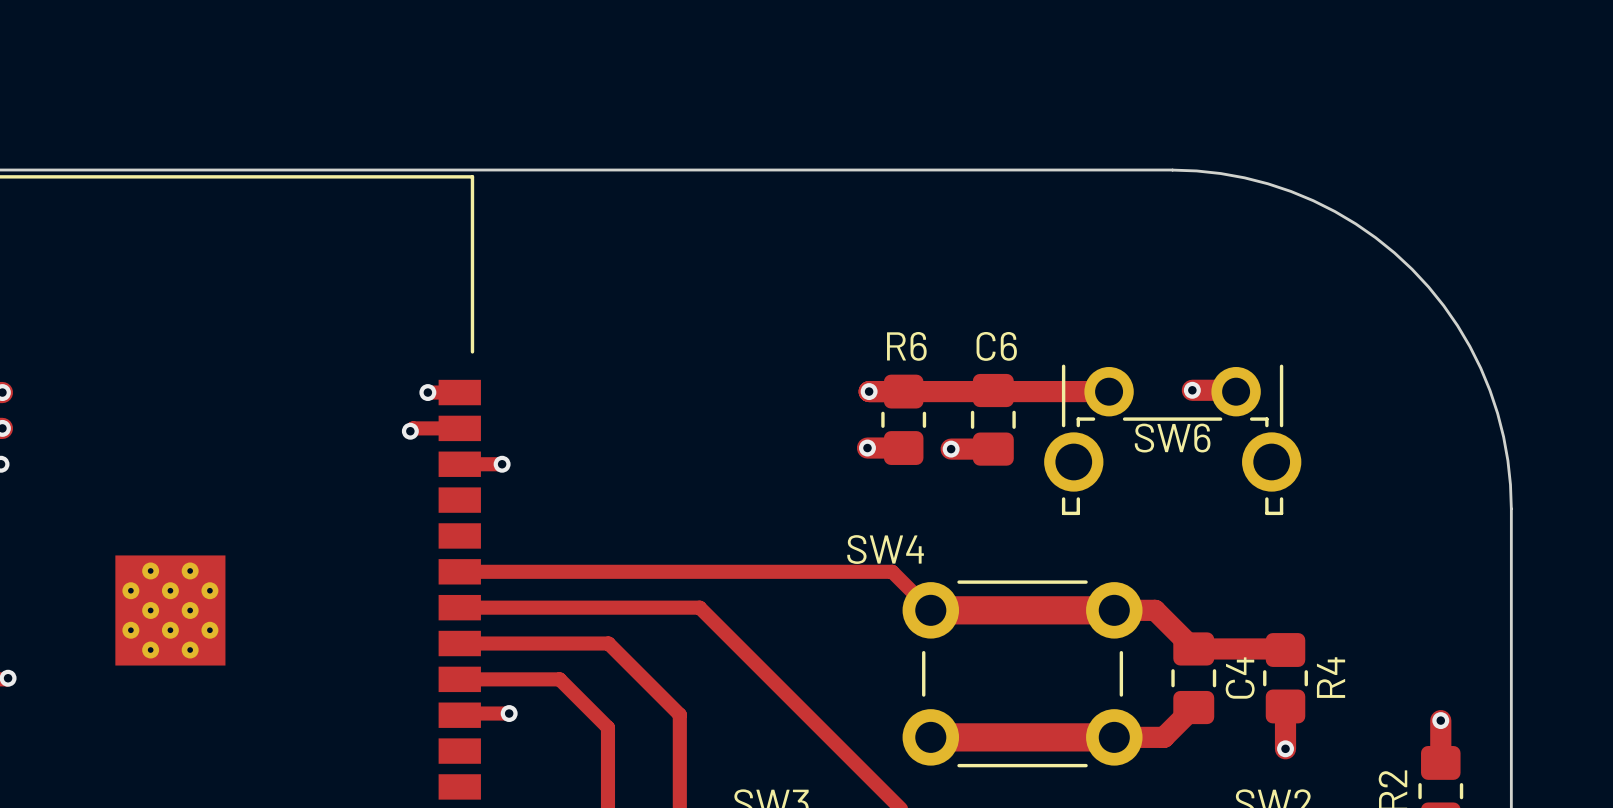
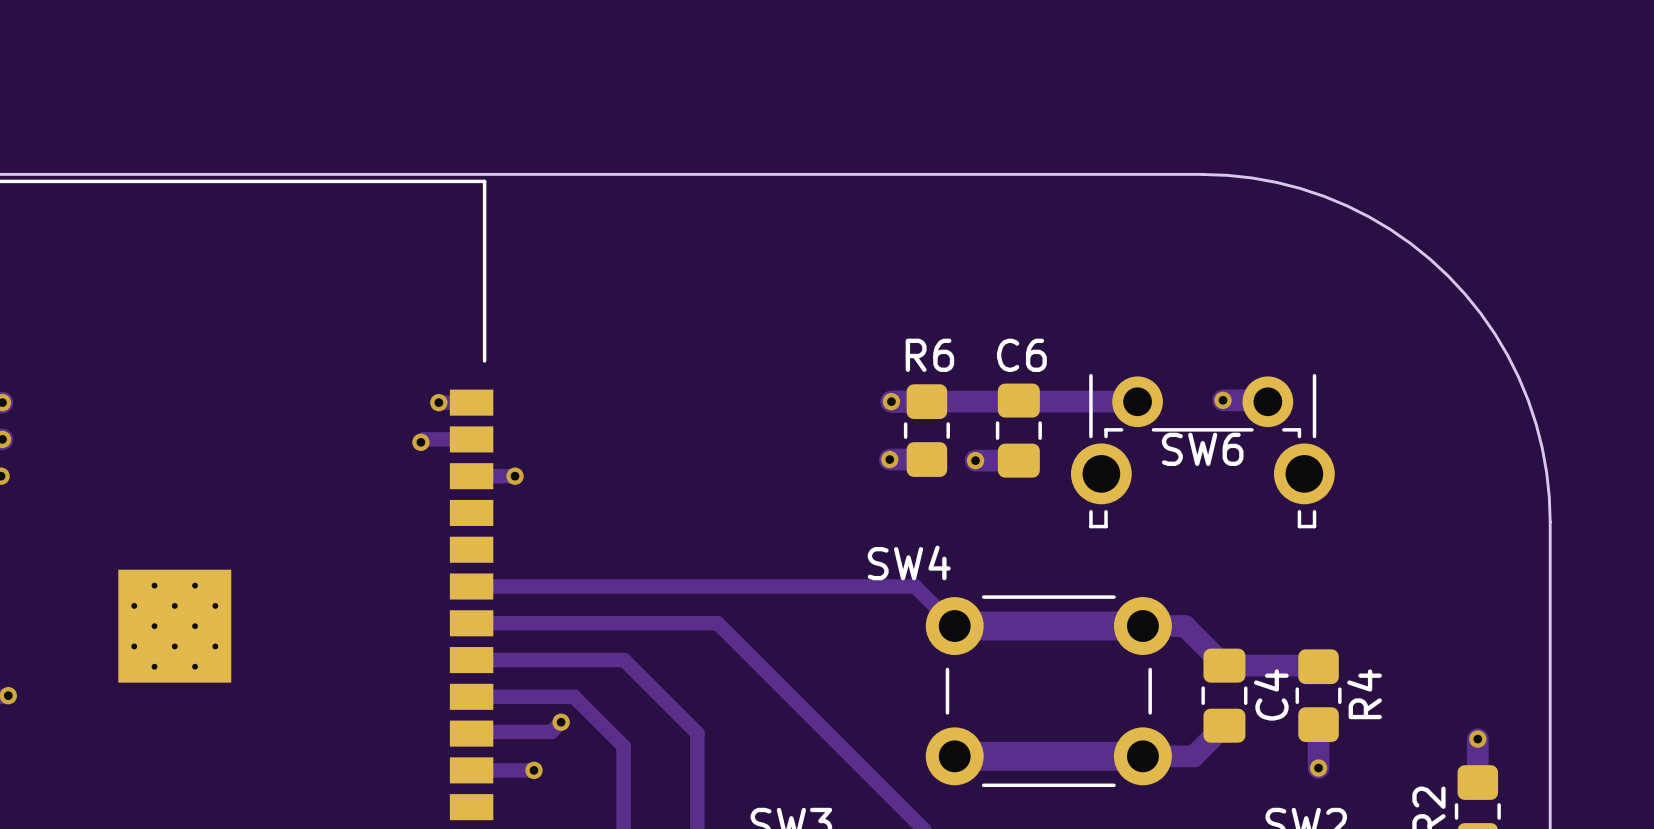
track: none -> (561, 722) (551, 731) (522, 731)
via: none -> (561, 722)
via: (509, 713) -> none
track: none -> (471, 770) (533, 770)
via: none -> (533, 770)

